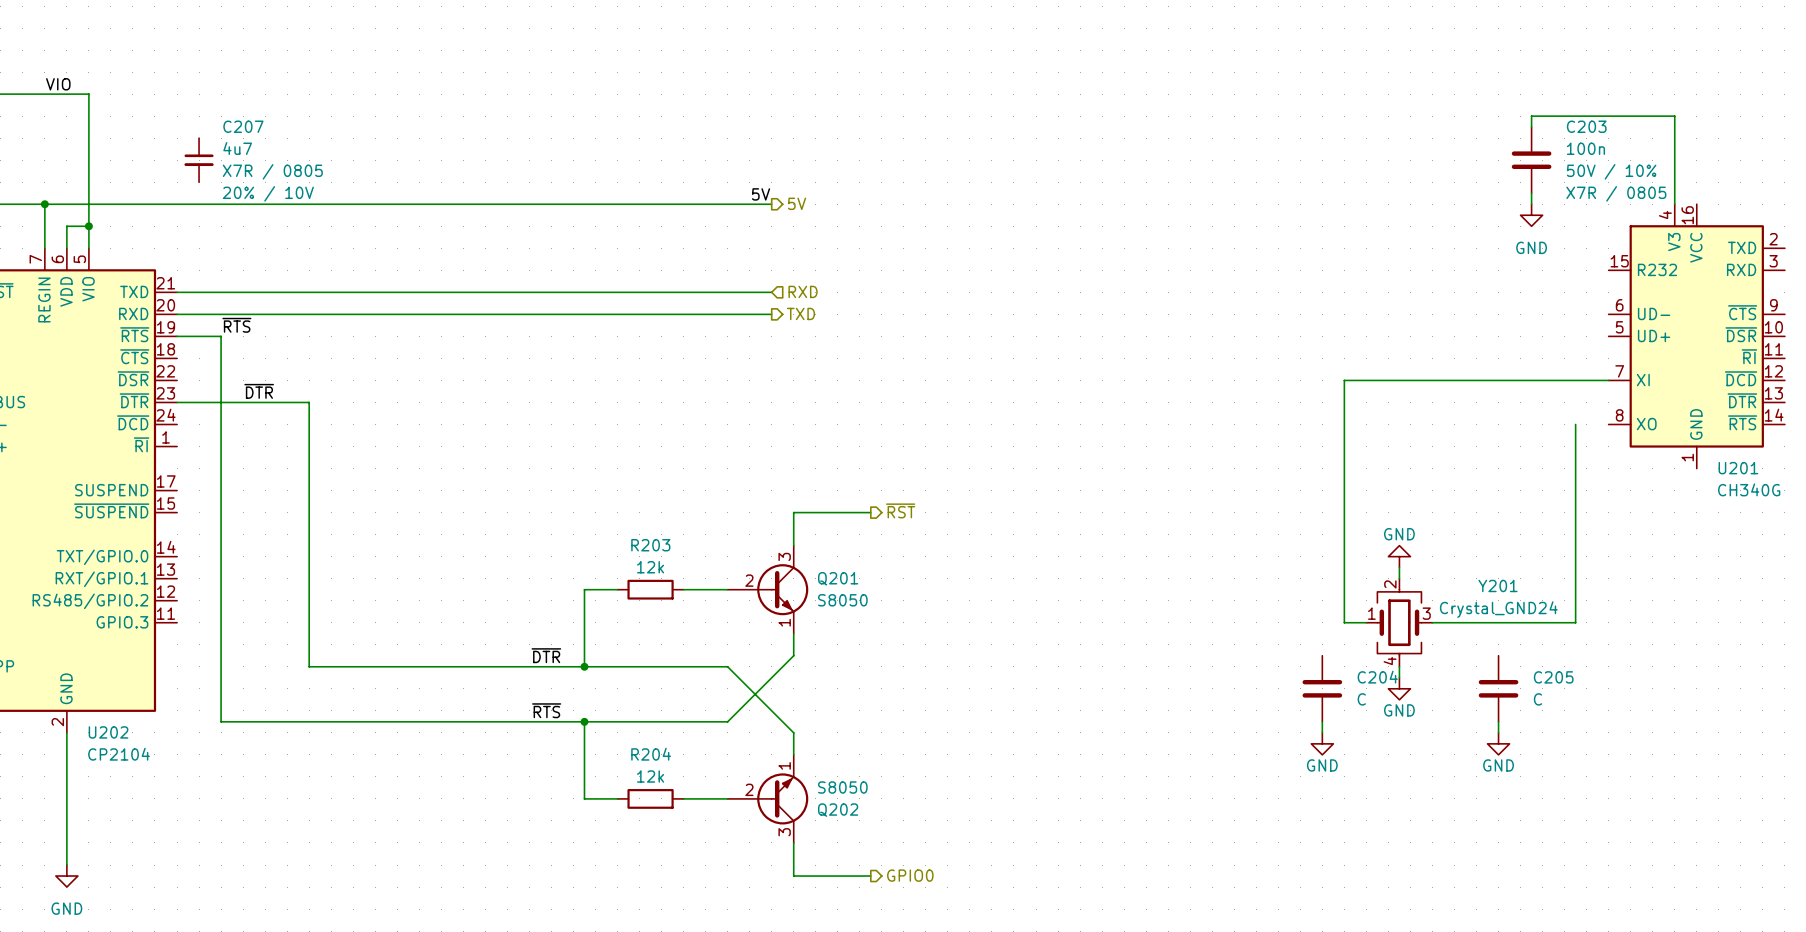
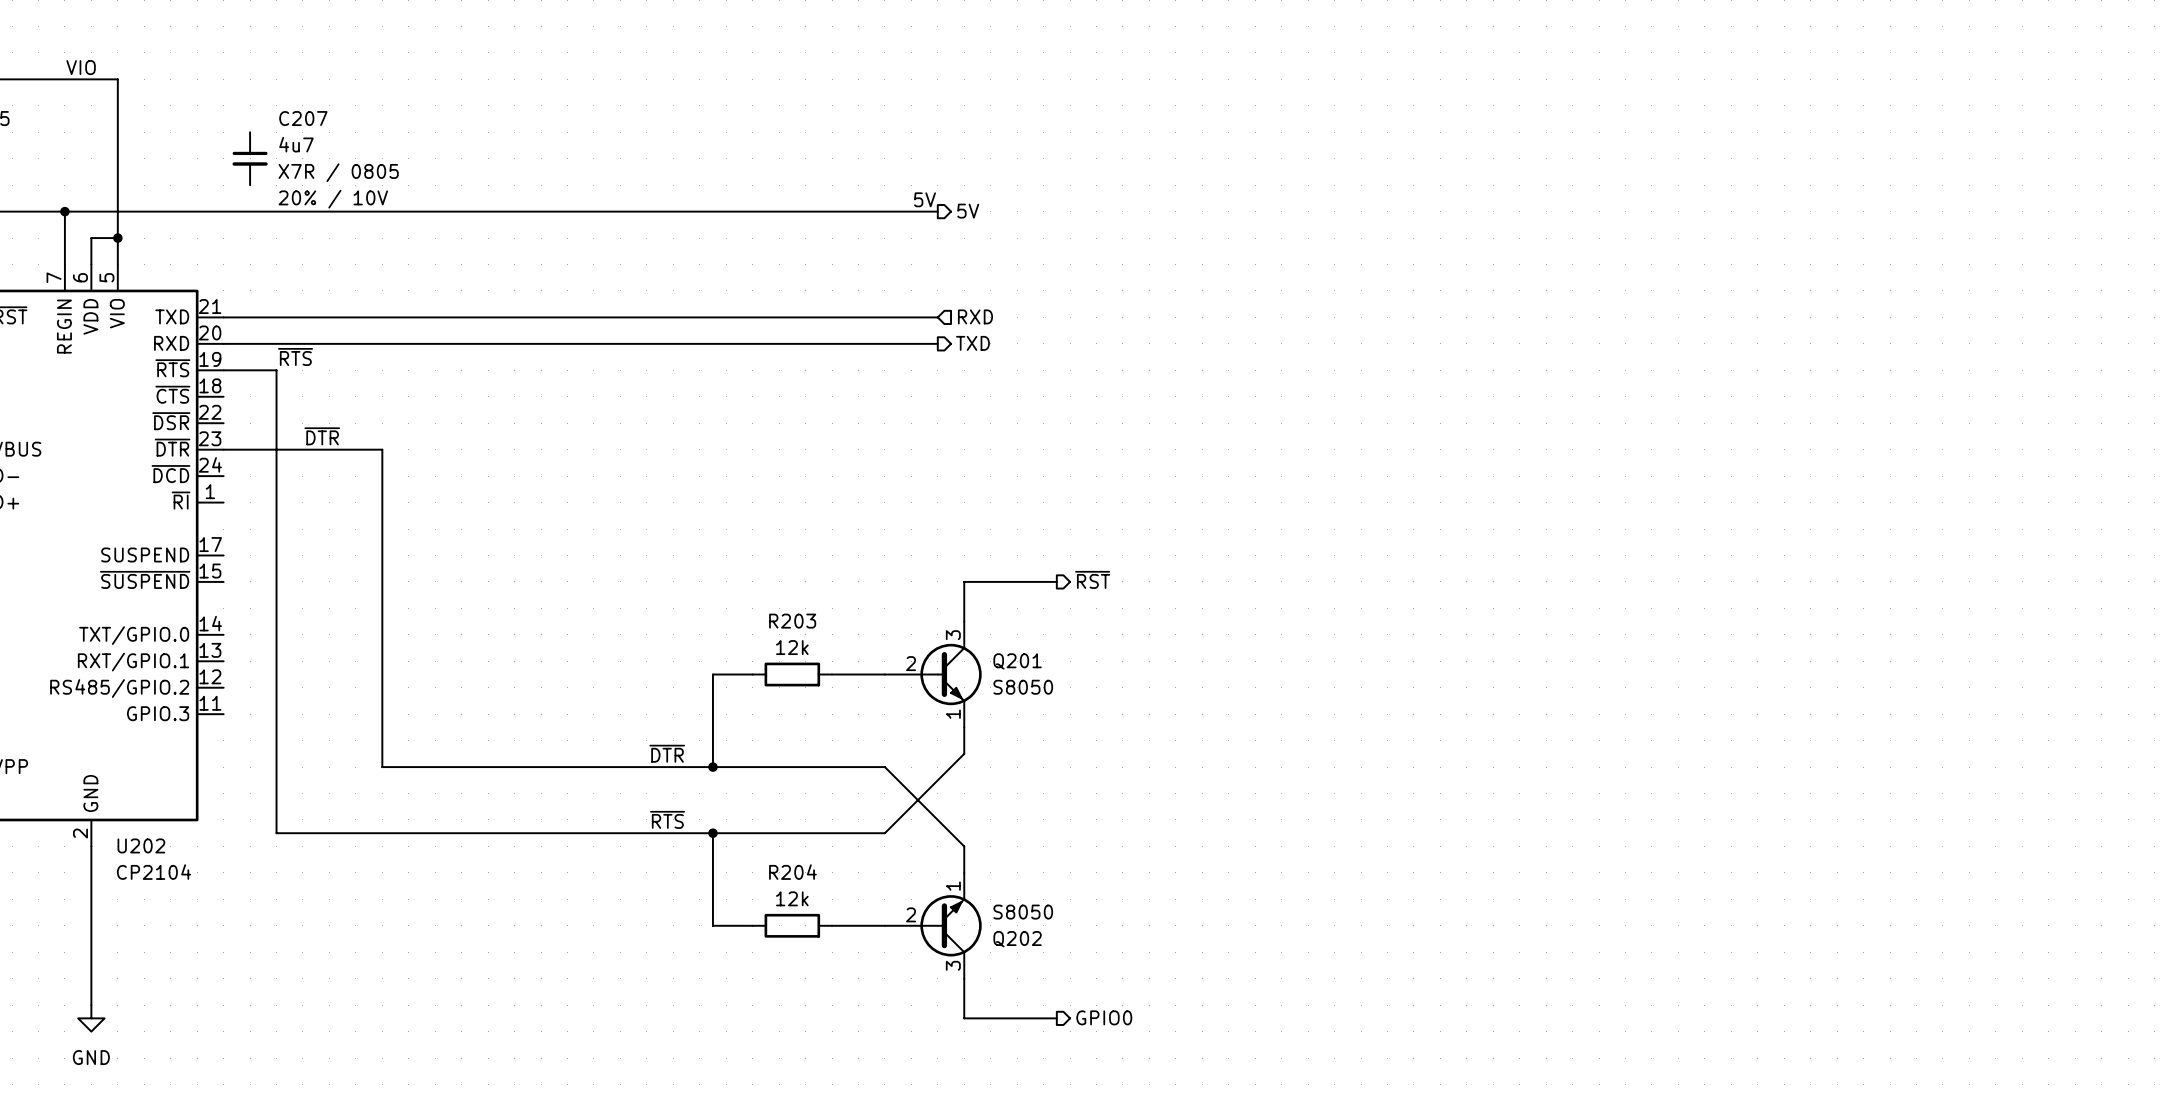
wire: (1531, 127) (1531, 116) (1674, 116) (1674, 204) -> none
C203: 100n (1531, 160) -> none
wire: (1531, 193) (1531, 204) -> none
power symbol: GND (1531, 215) -> none
U201: CH340G (1696, 336) -> none
wire: (1608, 380) (1344, 380) (1344, 622) (1366, 622) -> none
wire: (1575, 424) (1575, 622) (1432, 622) -> none
power symbol: GND (1399, 556) -> none
wire: (1399, 567) (1399, 578) -> none
Y201: Crystal_GND24 (1399, 622) -> none
wire: (1399, 666) (1399, 677) -> none
C204: C (1322, 688) -> none
power symbol: GND (1399, 688) -> none
C205: C (1498, 688) -> none
wire: (1322, 721) (1322, 732) -> none
wire: (1498, 721) (1498, 732) -> none
power symbol: GND (1322, 743) -> none
power symbol: GND (1498, 743) -> none

